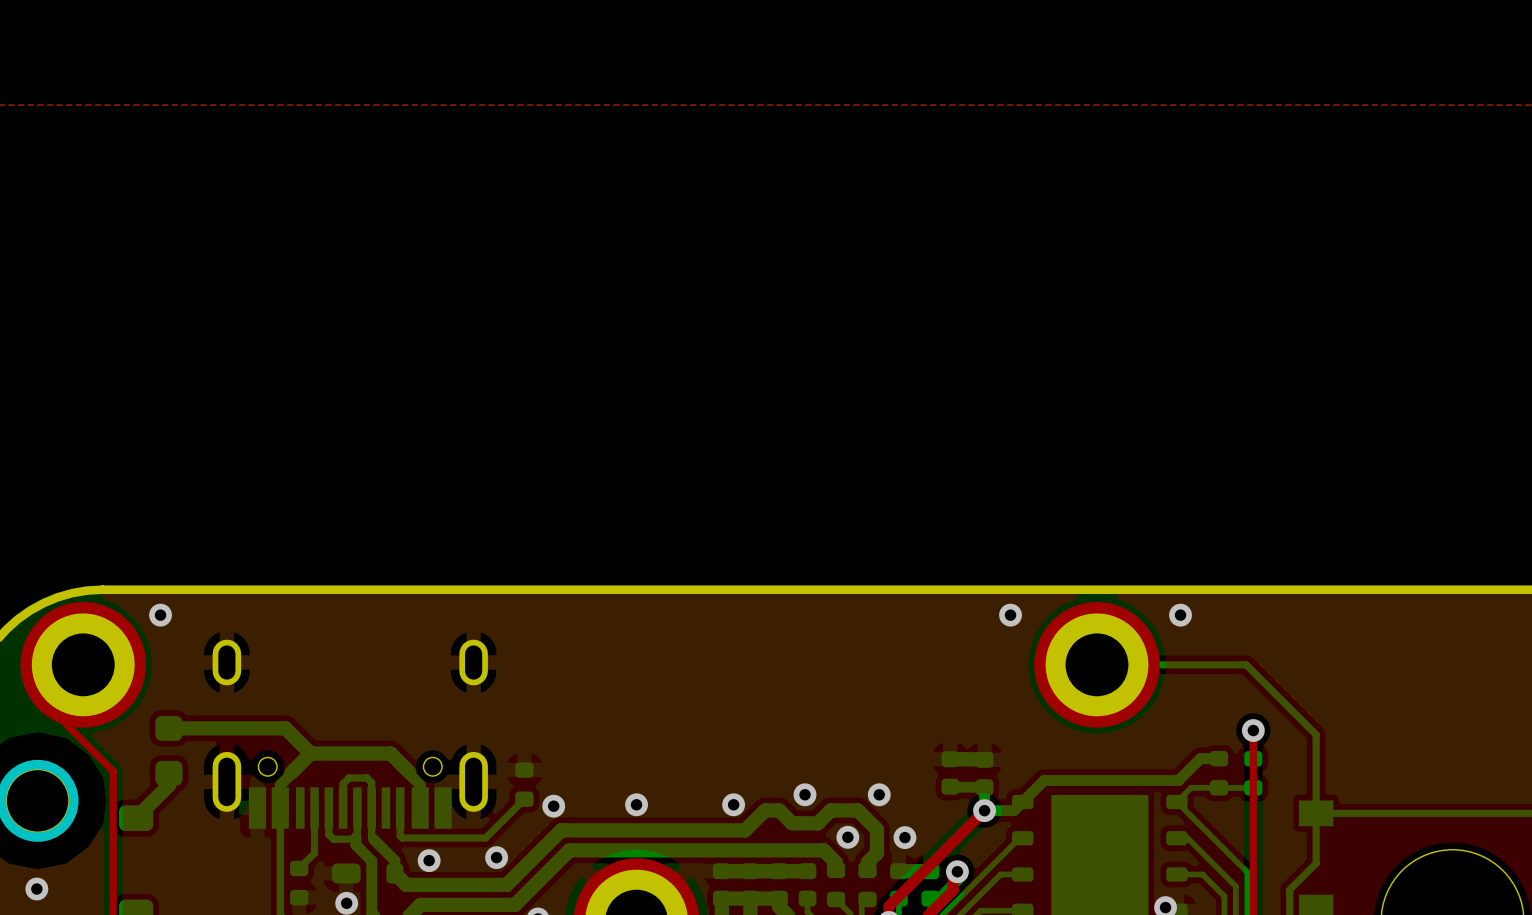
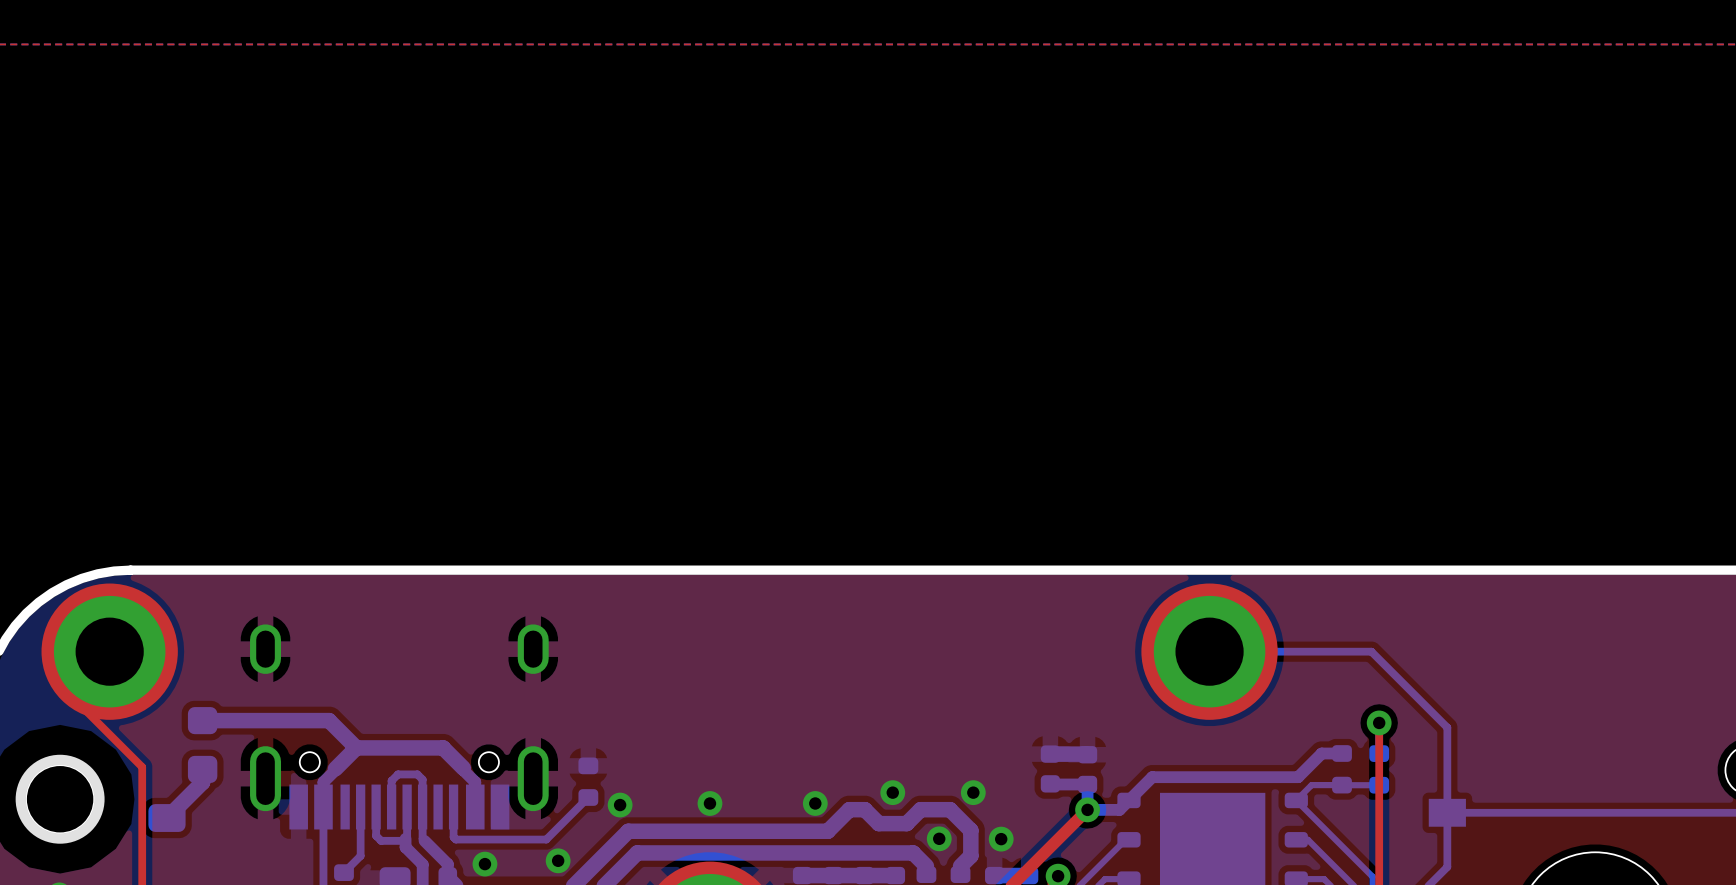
via: (160, 615) -> none
via: (1010, 615) -> none
via: (1180, 615) -> none

